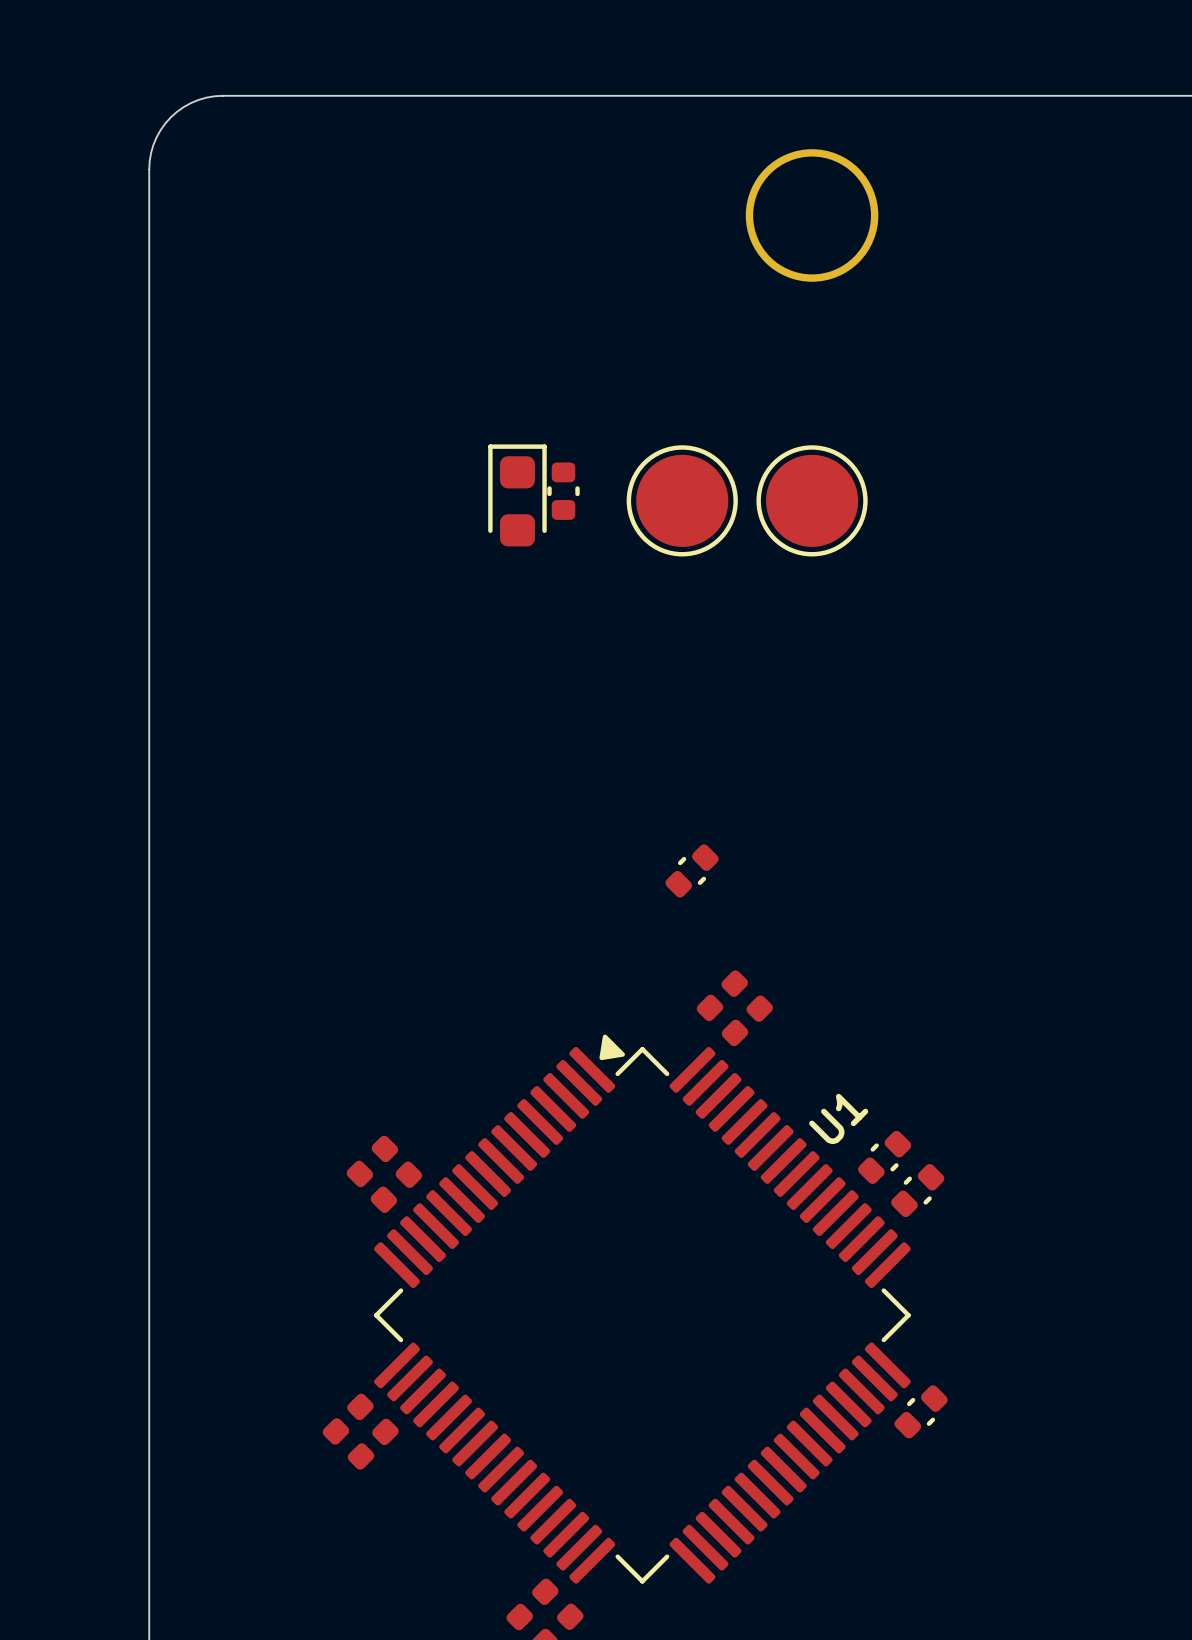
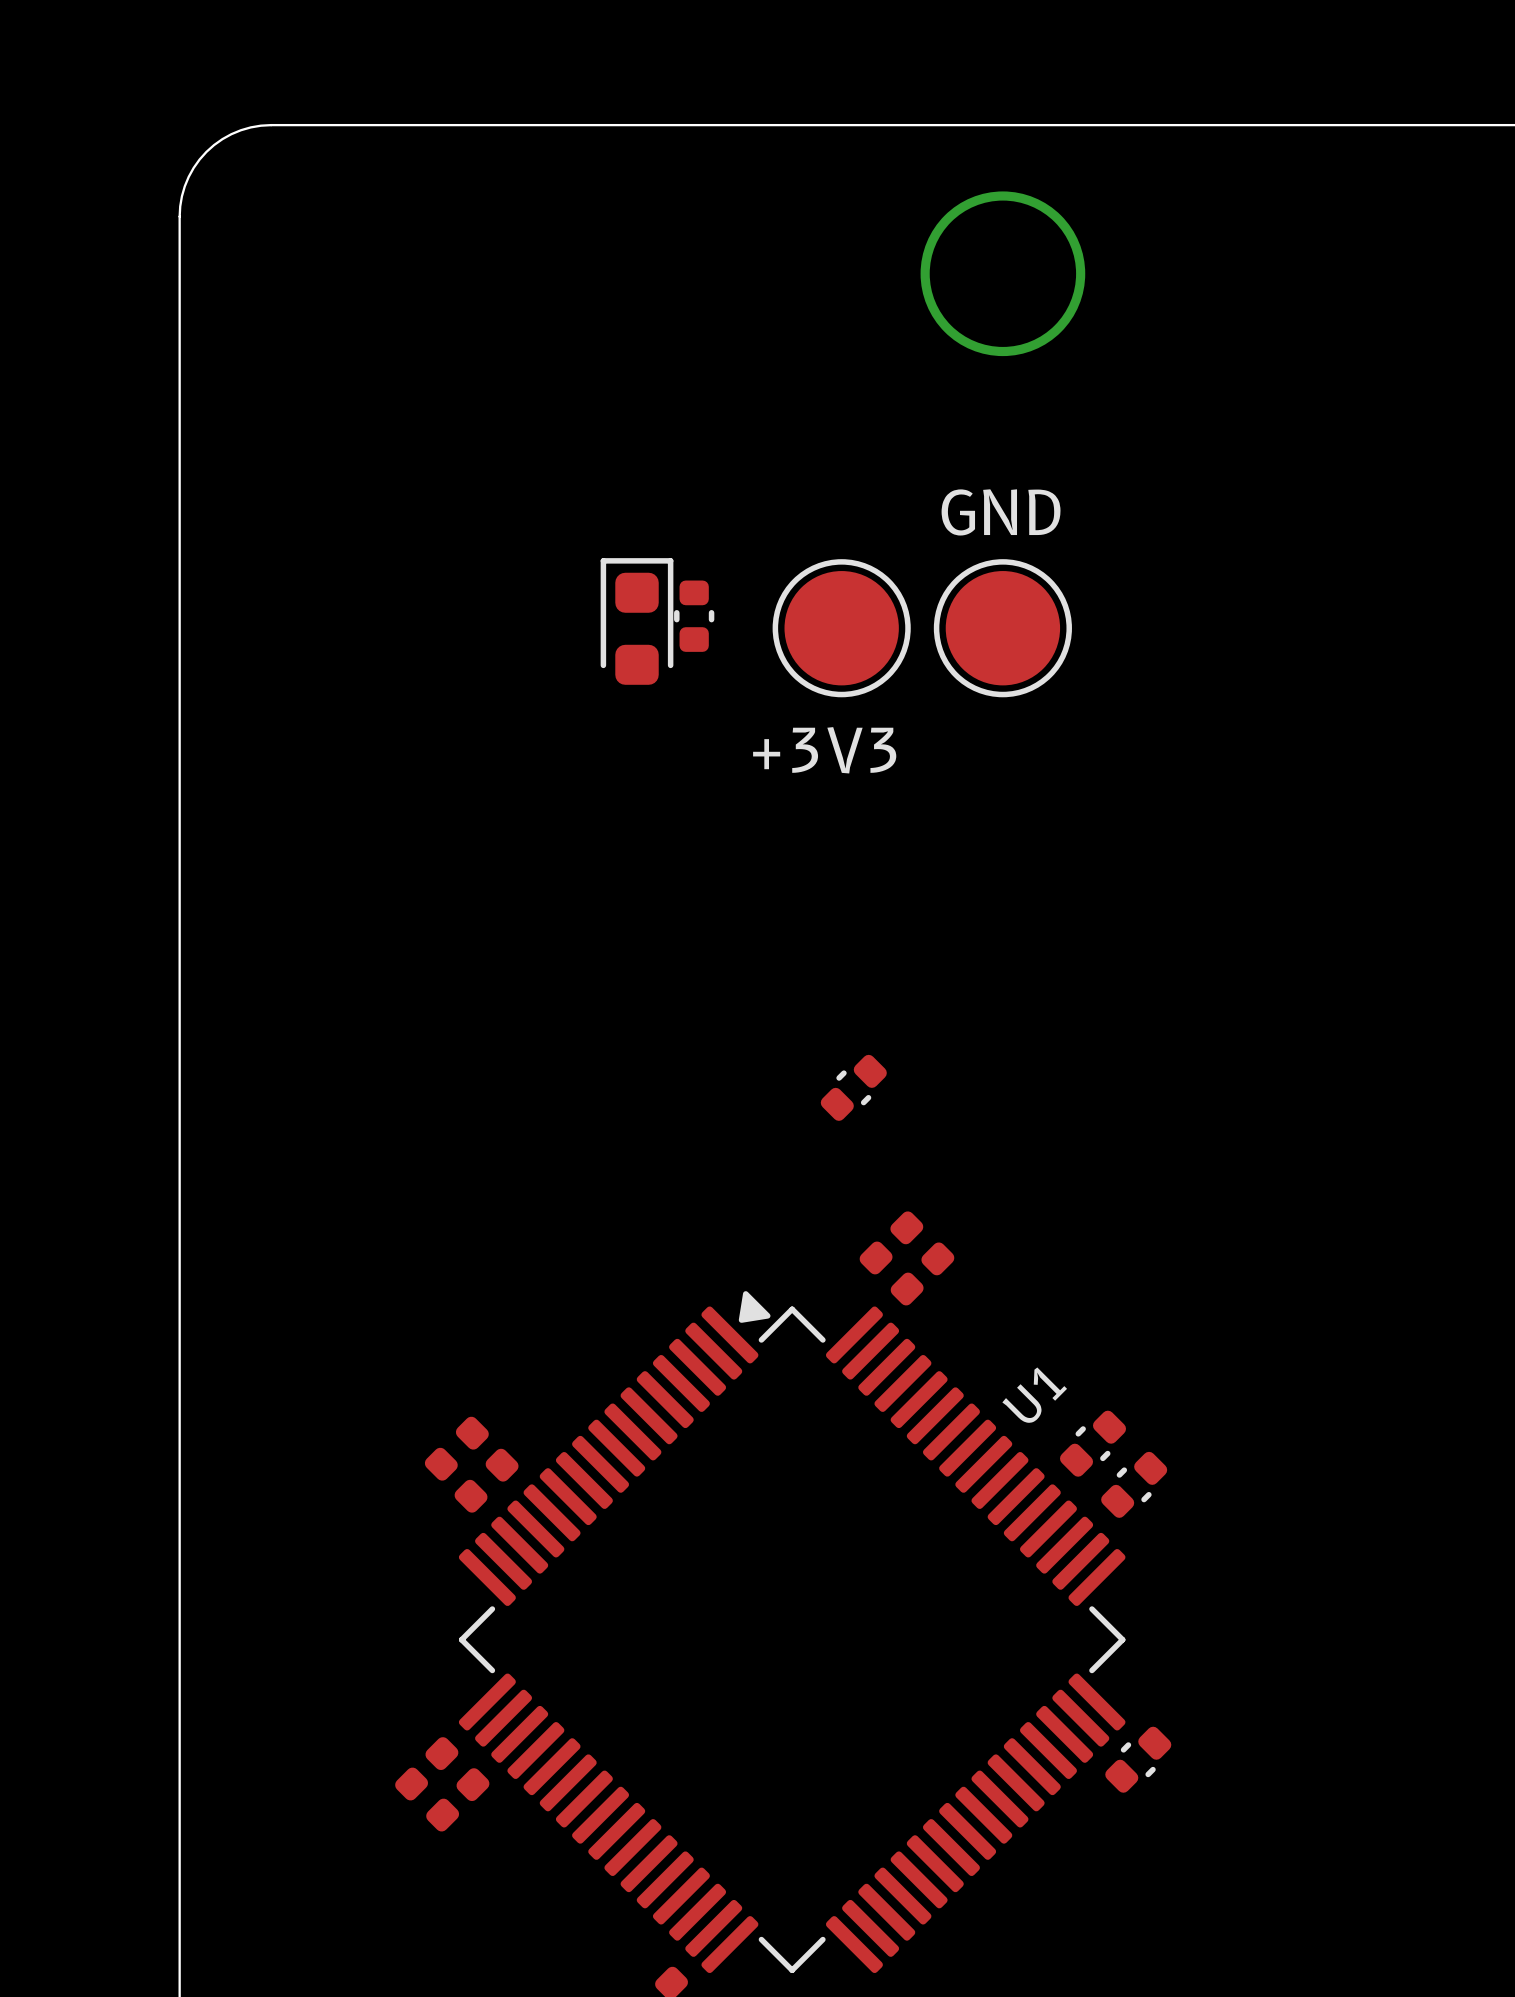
part text: none -> GND (1001, 512)
part text: none -> +3V3 (824, 750)

